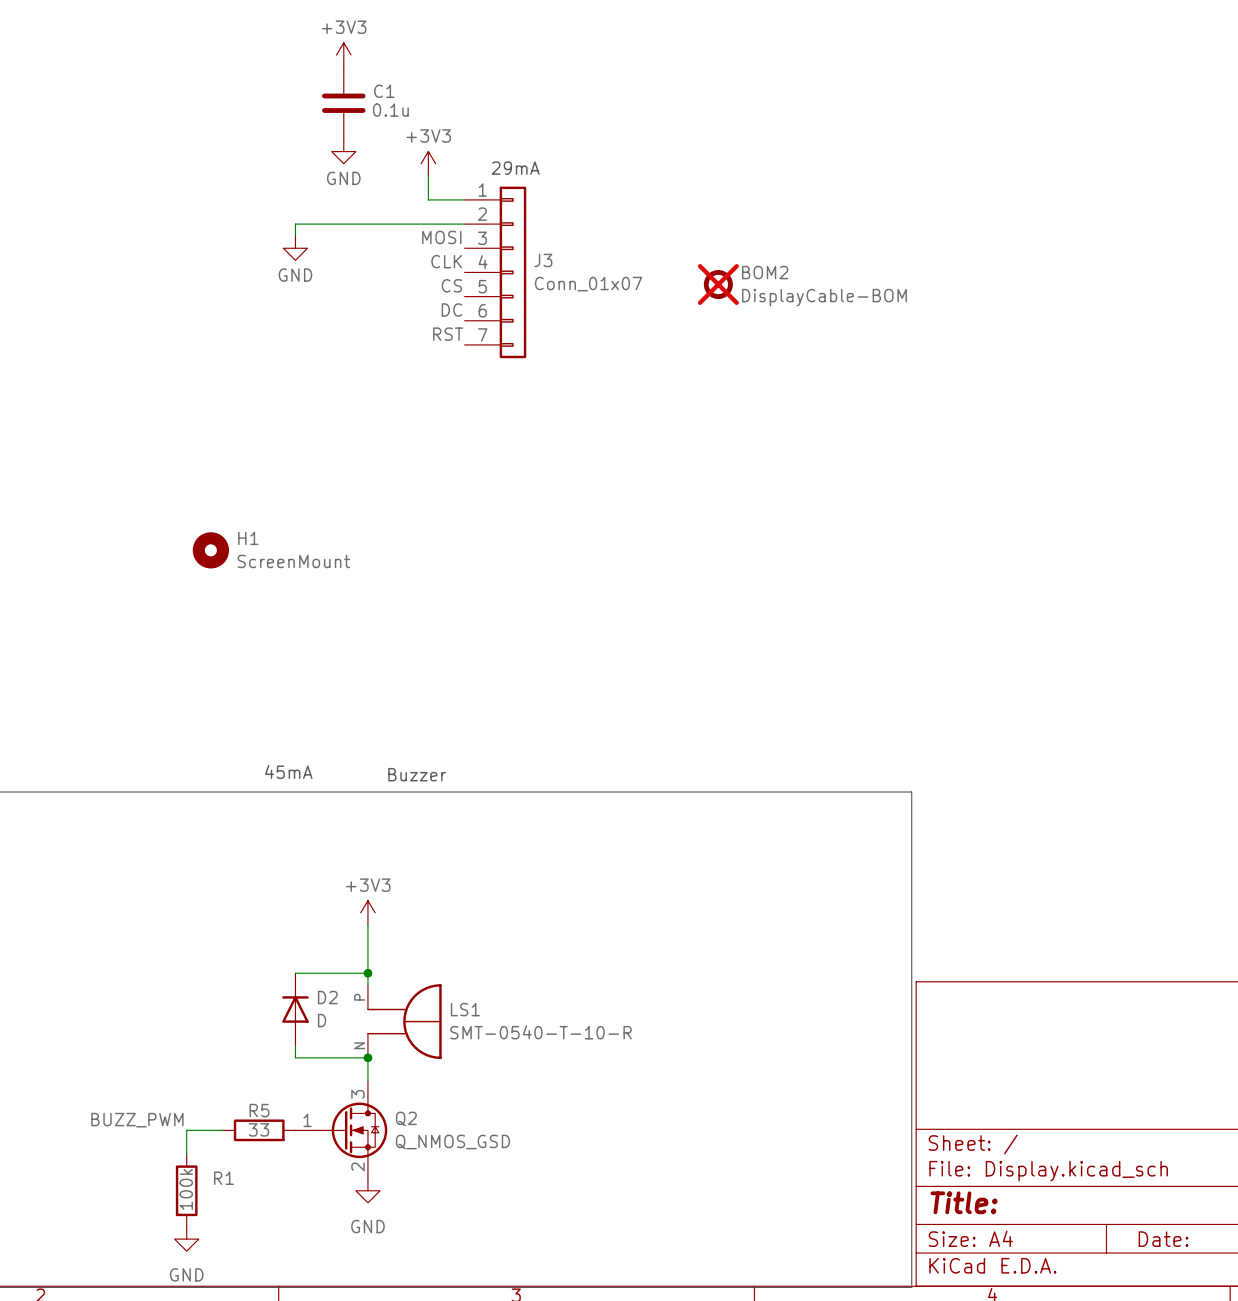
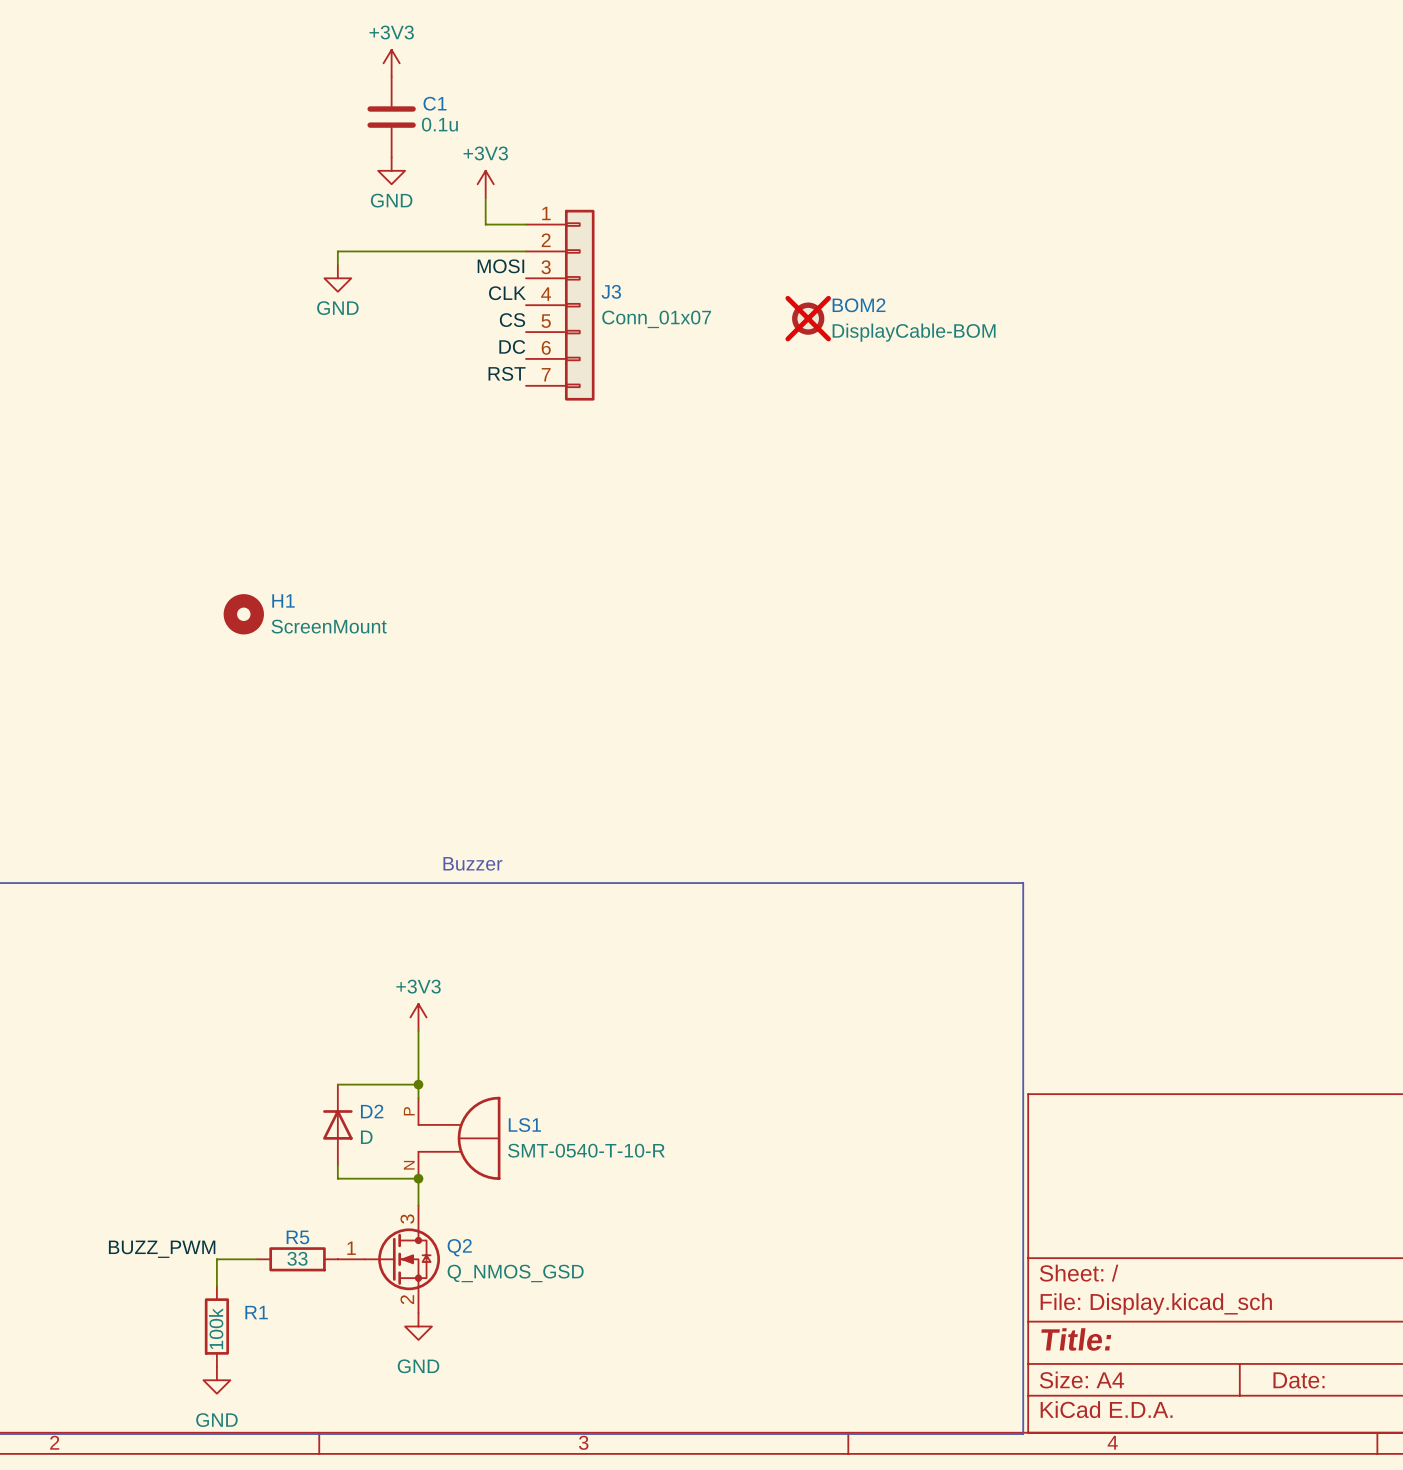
text: 29mA (515, 168) -> none
text: 45mA (288, 771) -> none

